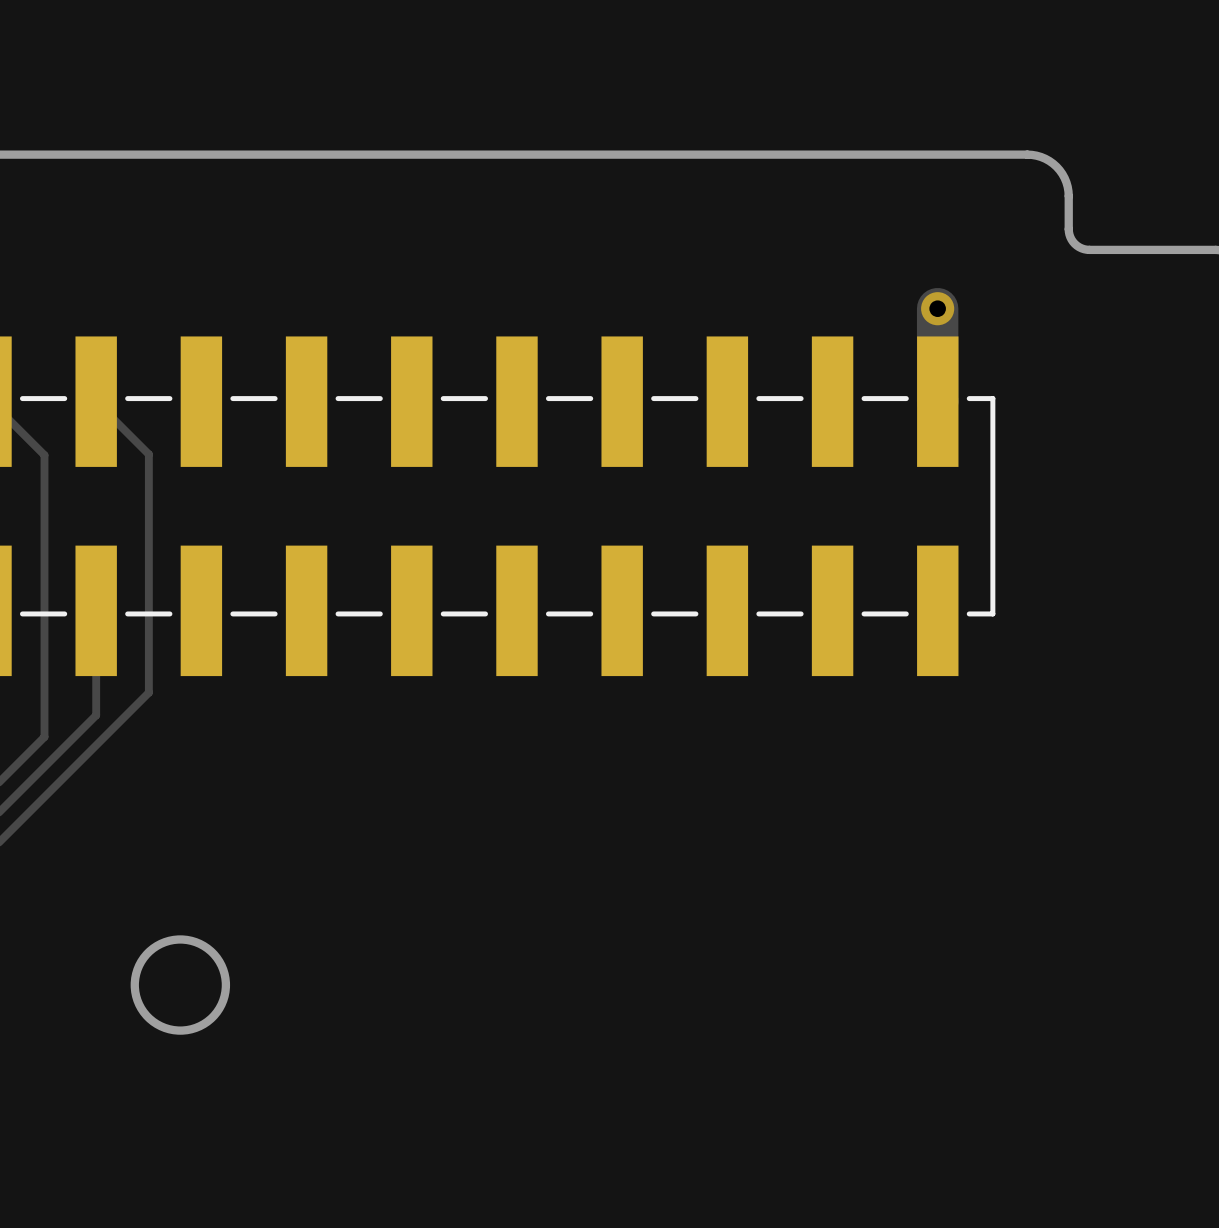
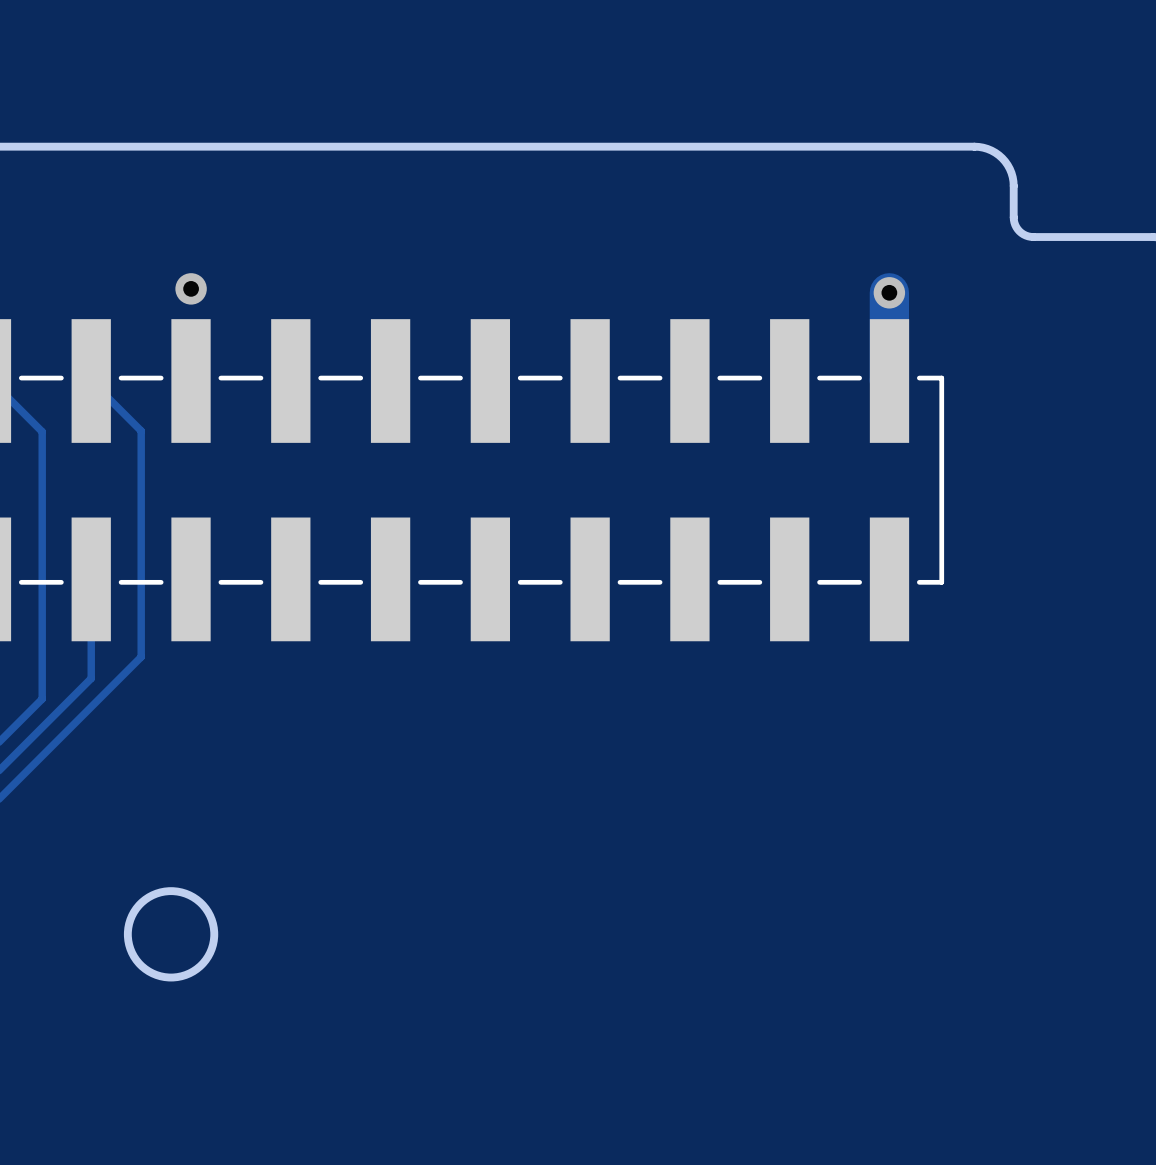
via: none -> (191, 288)

